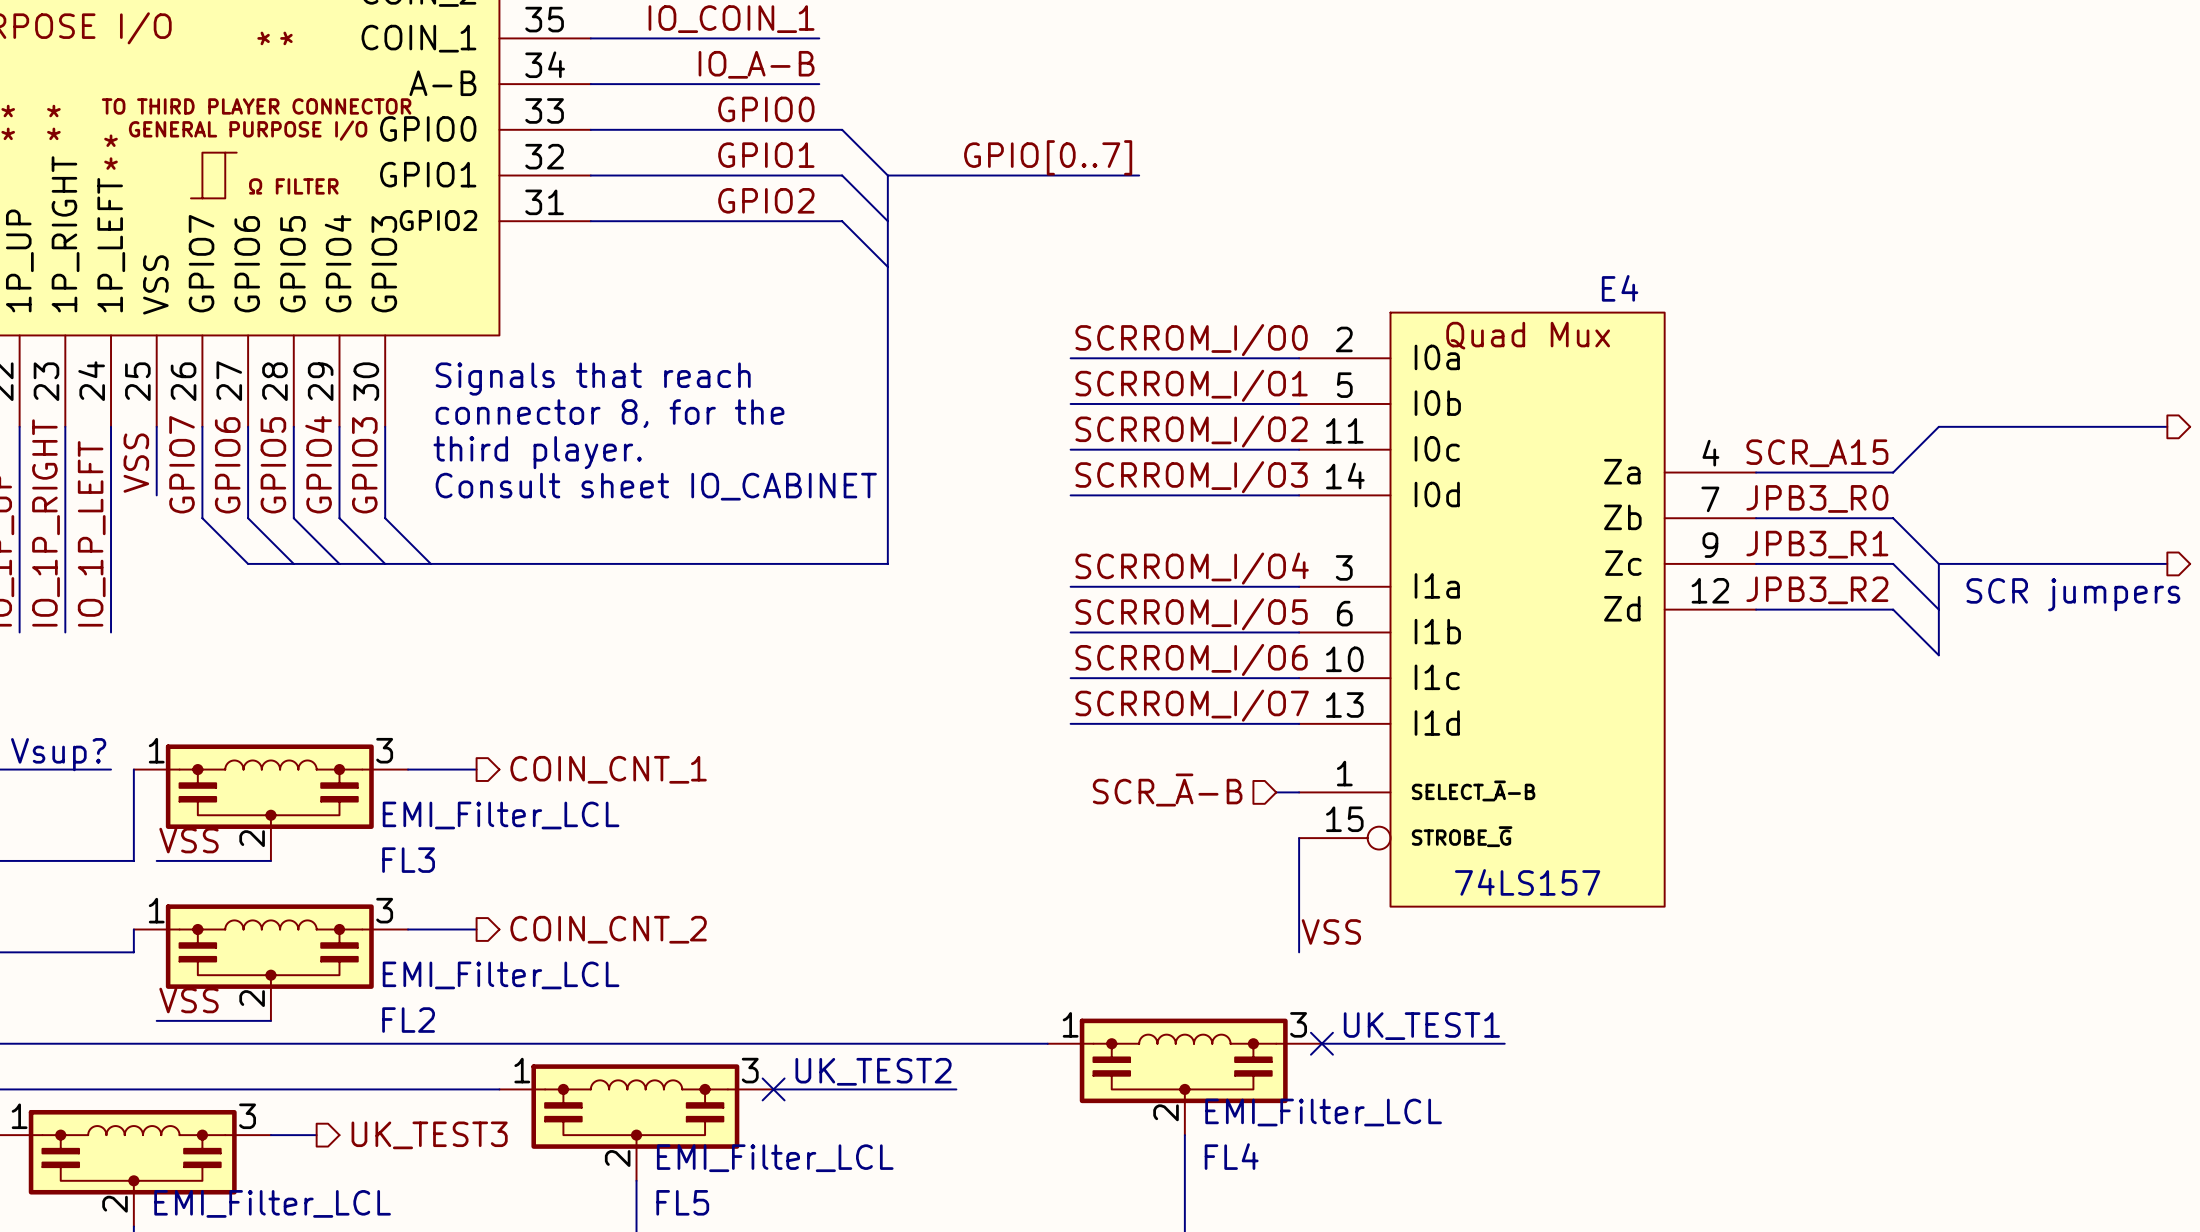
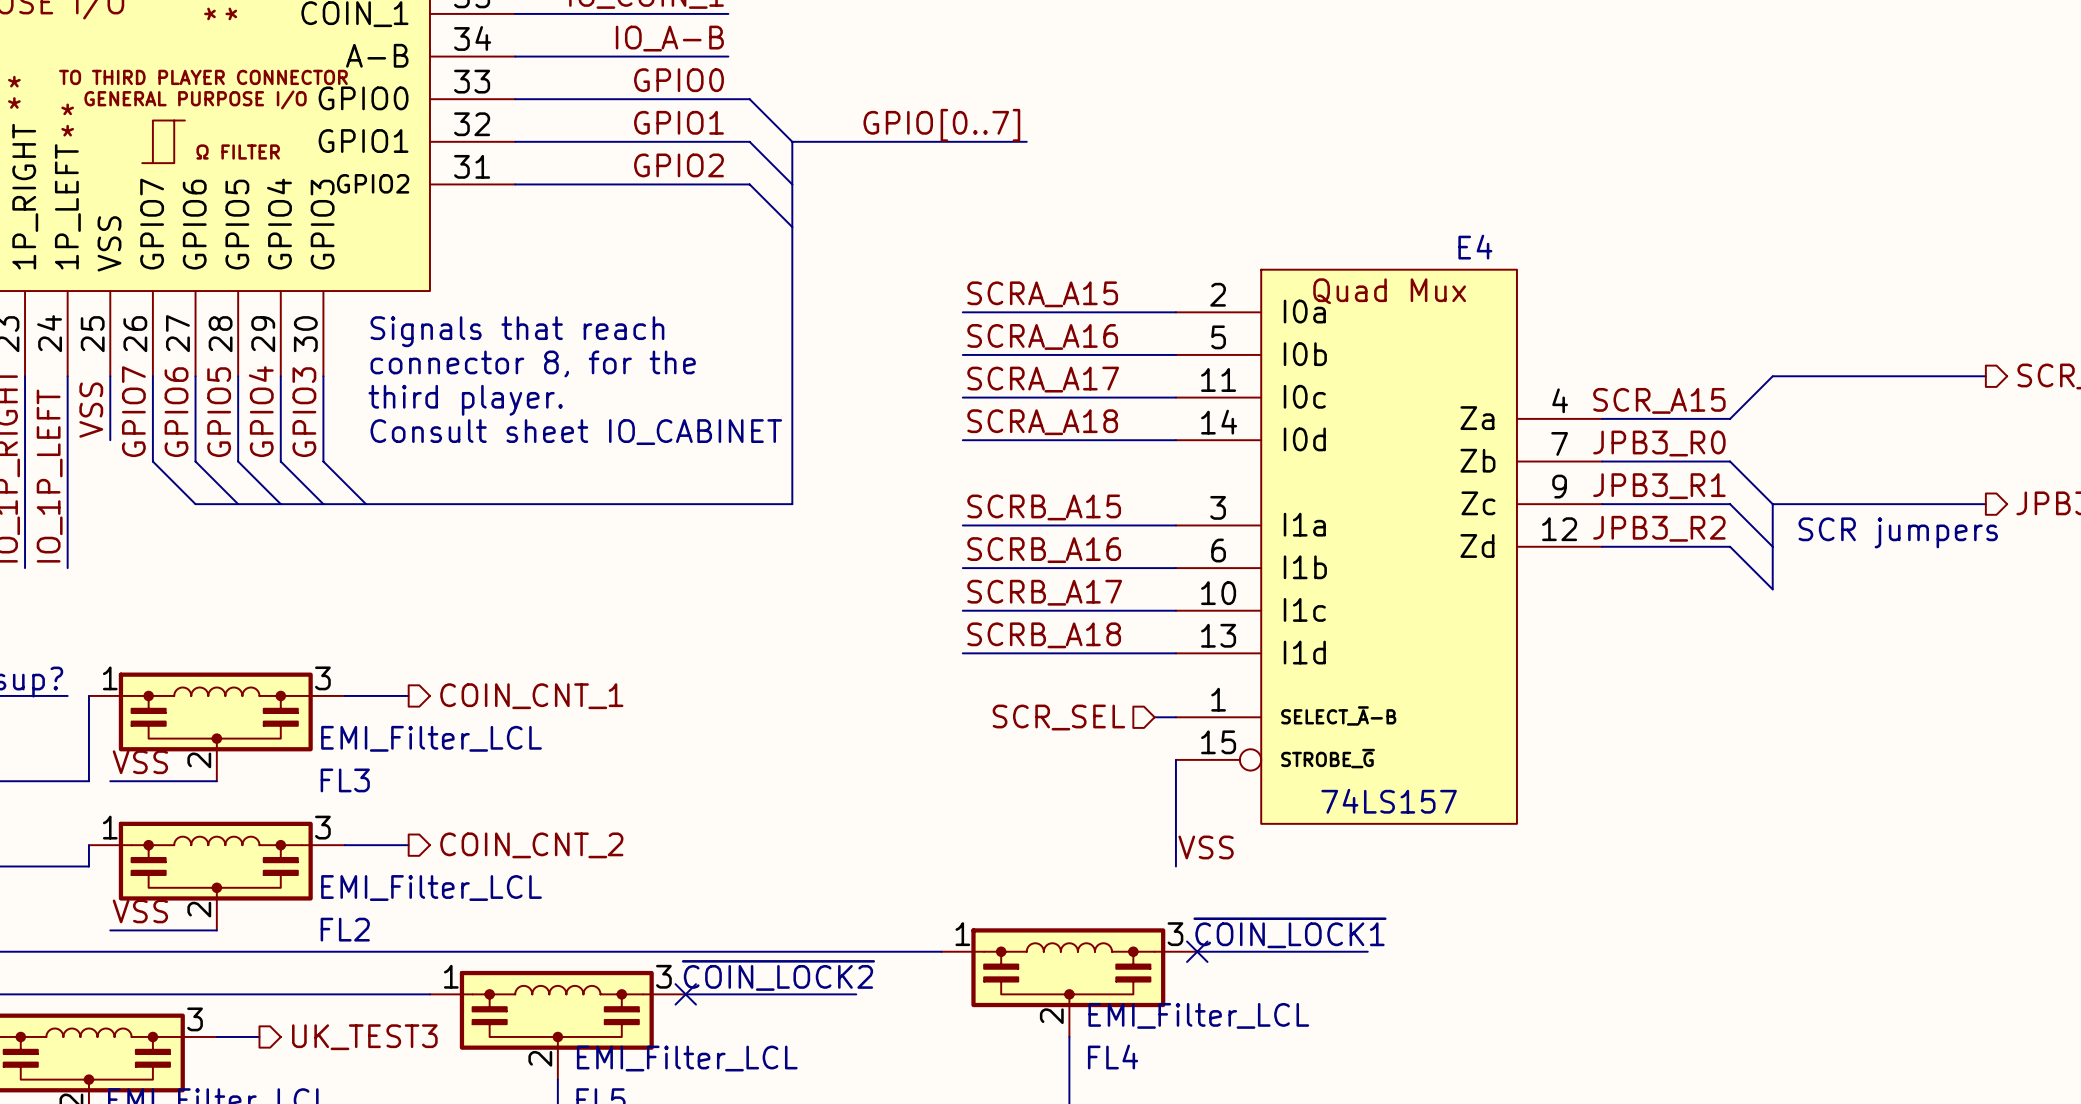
label: SCRROM_I/O0 (1191, 340) -> SCRA_A15 (1042, 294)
label: SCRROM_I/O1 (1191, 385) -> SCRA_A16 (1042, 336)
label: SCRROM_I/O2 (1191, 431) -> SCRA_A17 (1043, 379)
label: SCRROM_I/O3 (1191, 477) -> SCRA_A18 (1042, 422)
label: SCRROM_I/O4 (1192, 568) -> SCRB_A15 (1044, 507)
label: SCRROM_I/O5 (1191, 614) -> SCRB_A16 (1044, 550)
label: SCRROM_I/O6 (1191, 659) -> SCRB_A17 (1044, 592)
label: SCRROM_I/O7 (1192, 705) -> SCRB_A18 (1044, 635)
hierarchical label: SCR_~{A}-B (1167, 790) -> SCR_SEL (1058, 717)
text: none -> ~{COIN_LOCK1} (1289, 932)
text: UK_TEST1 (1421, 1026) -> none
text: none -> ~{COIN_LOCK2} (778, 975)
text: UK_TEST2 (873, 1071) -> none

